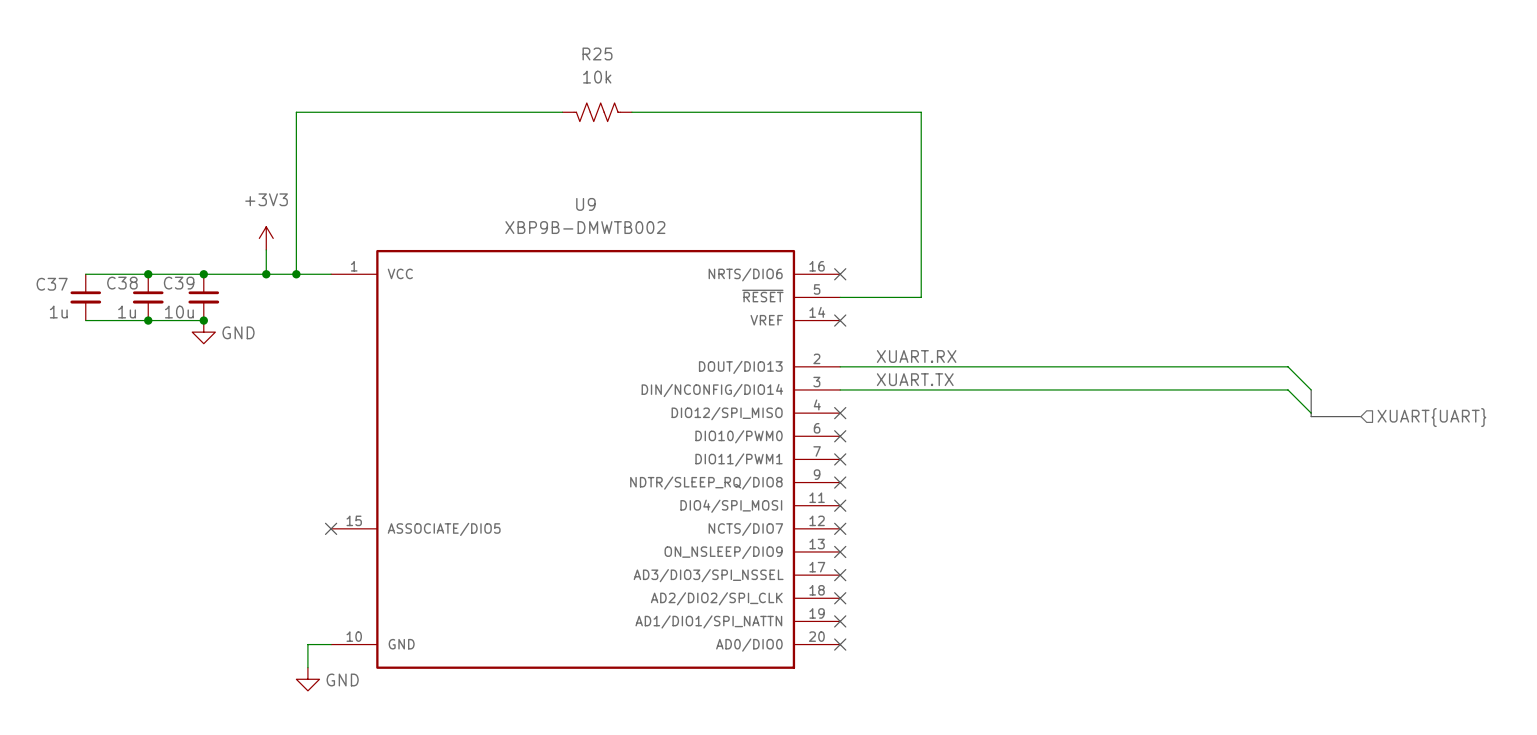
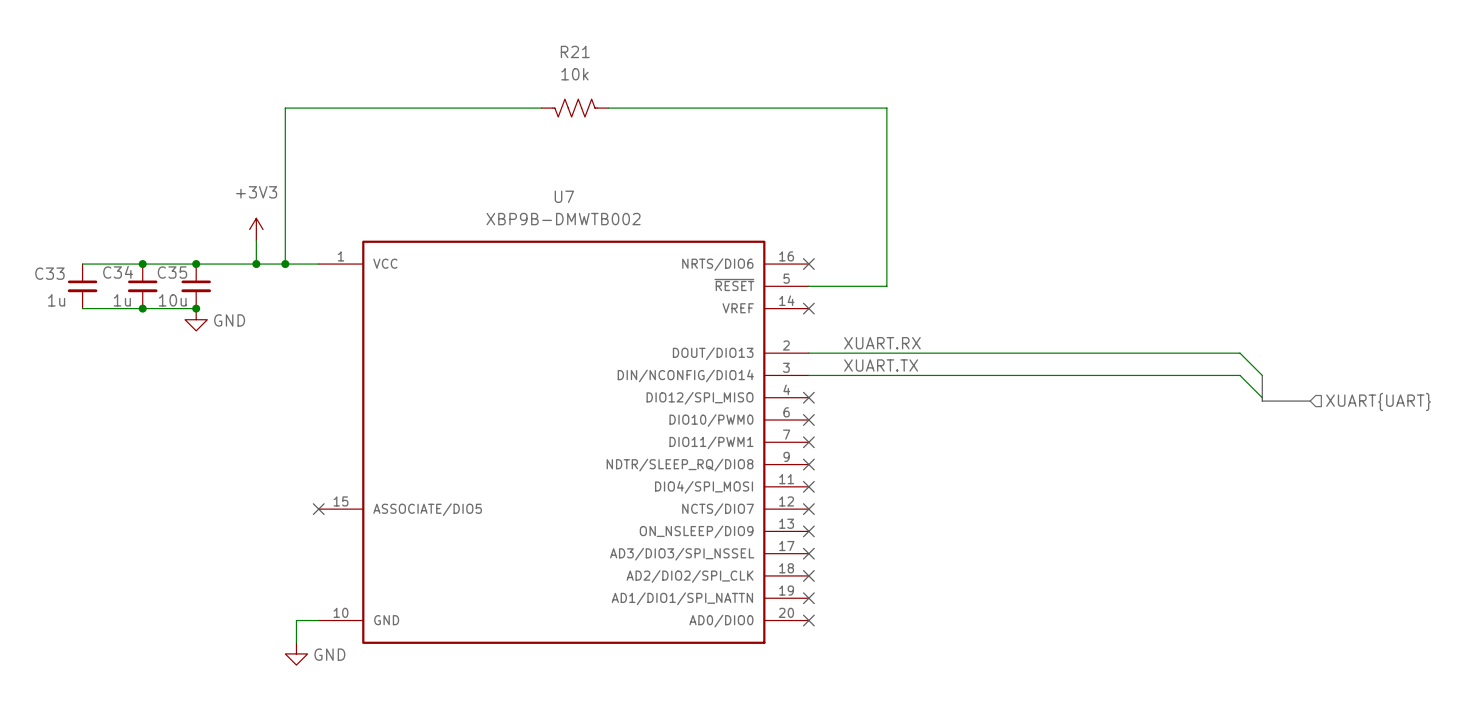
R25 name: R25 (597, 53) -> R21 (575, 51)
U9 name: U9 (585, 204) -> U7 (564, 196)
C38 name: C38 (122, 283) -> C34 (118, 272)
C39 name: C39 (179, 283) -> C35 (172, 272)
C37 name: C37 (52, 284) -> C33 (49, 273)

